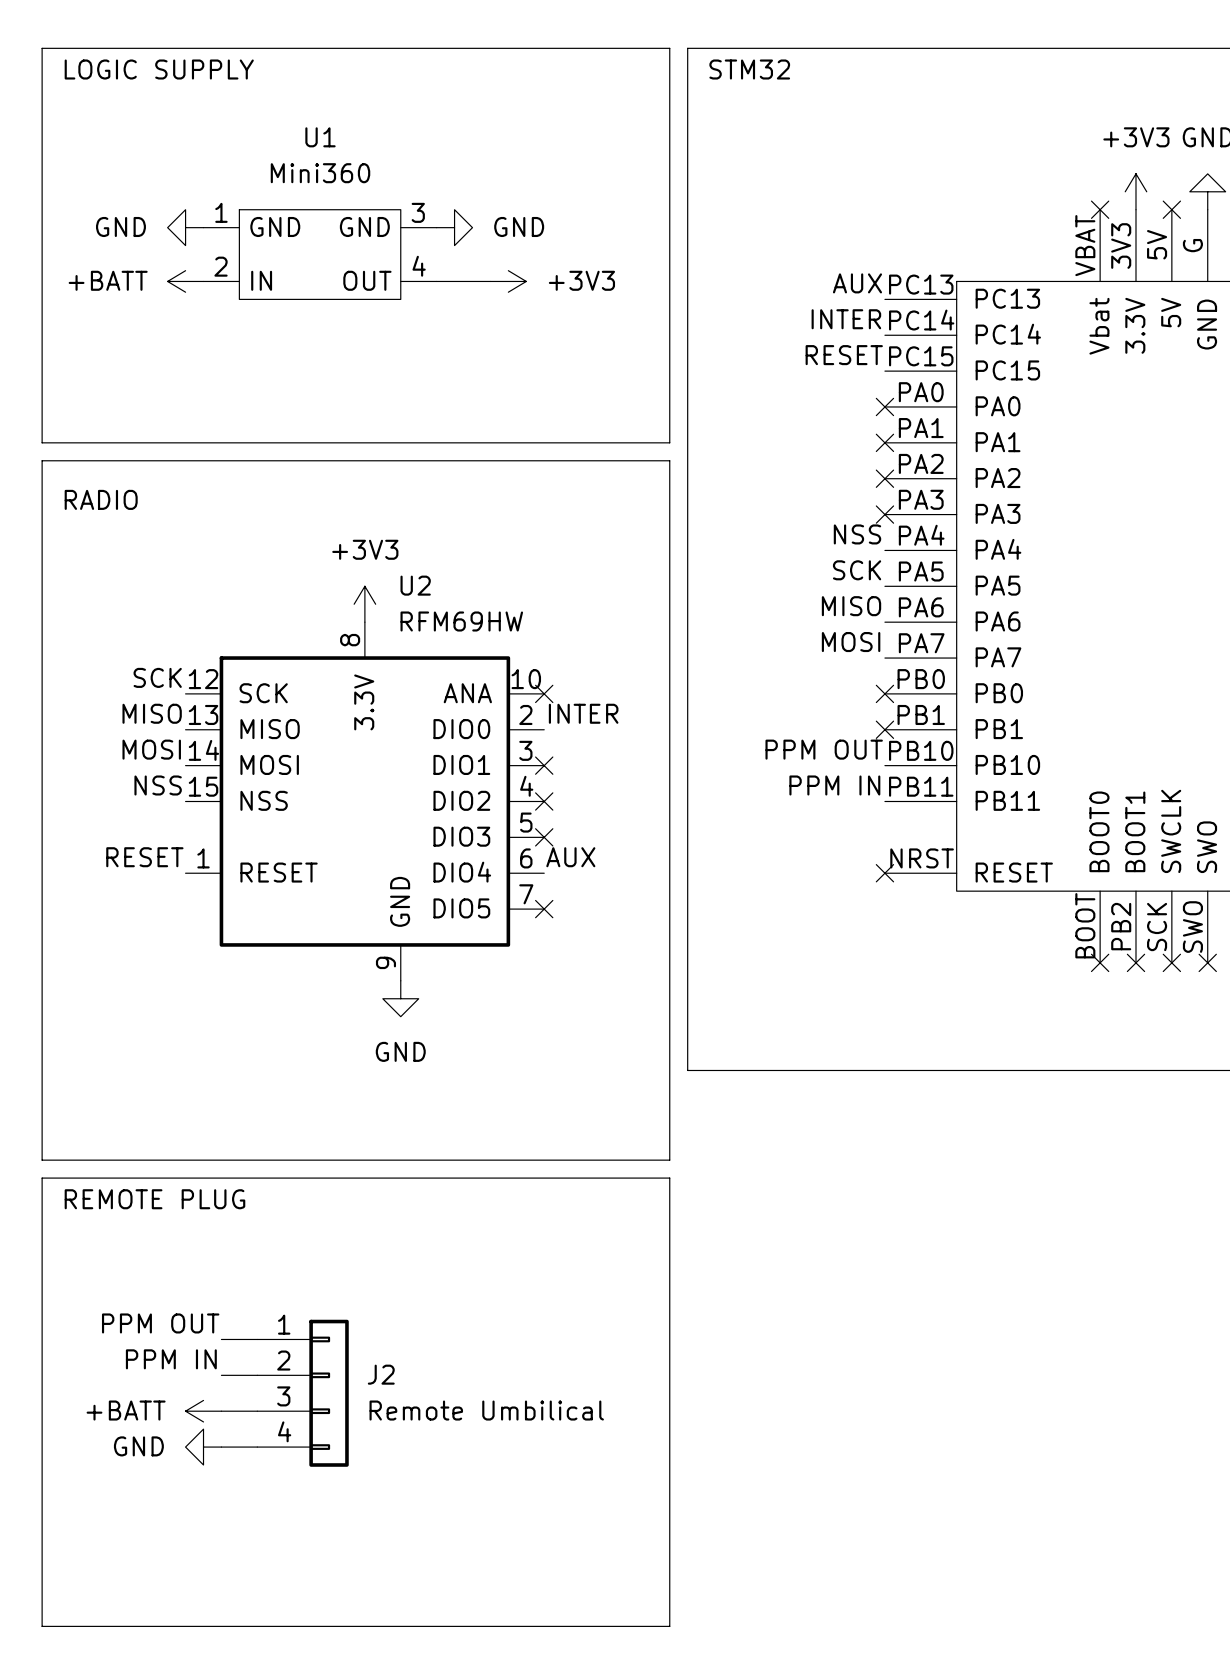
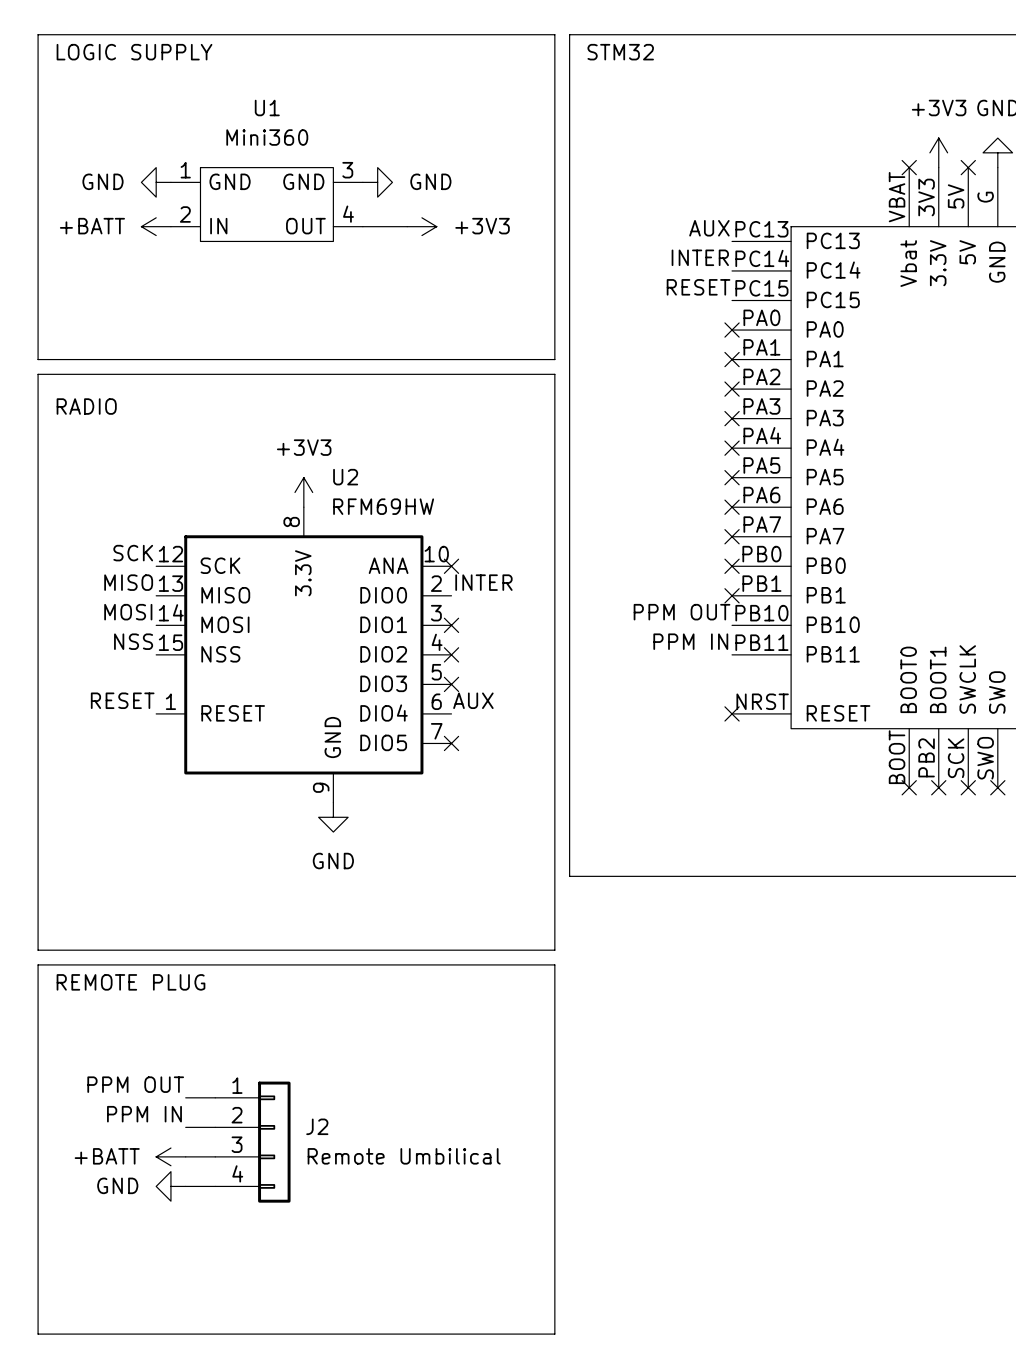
label: NSS (857, 534) -> none
no-connect mark: none -> (732, 448)
label: SCK (857, 570) -> none
no-connect mark: none -> (732, 477)
label: MISO (851, 606) -> none
no-connect mark: none -> (732, 507)
label: MOSI (851, 642) -> none
no-connect mark: none -> (732, 536)

